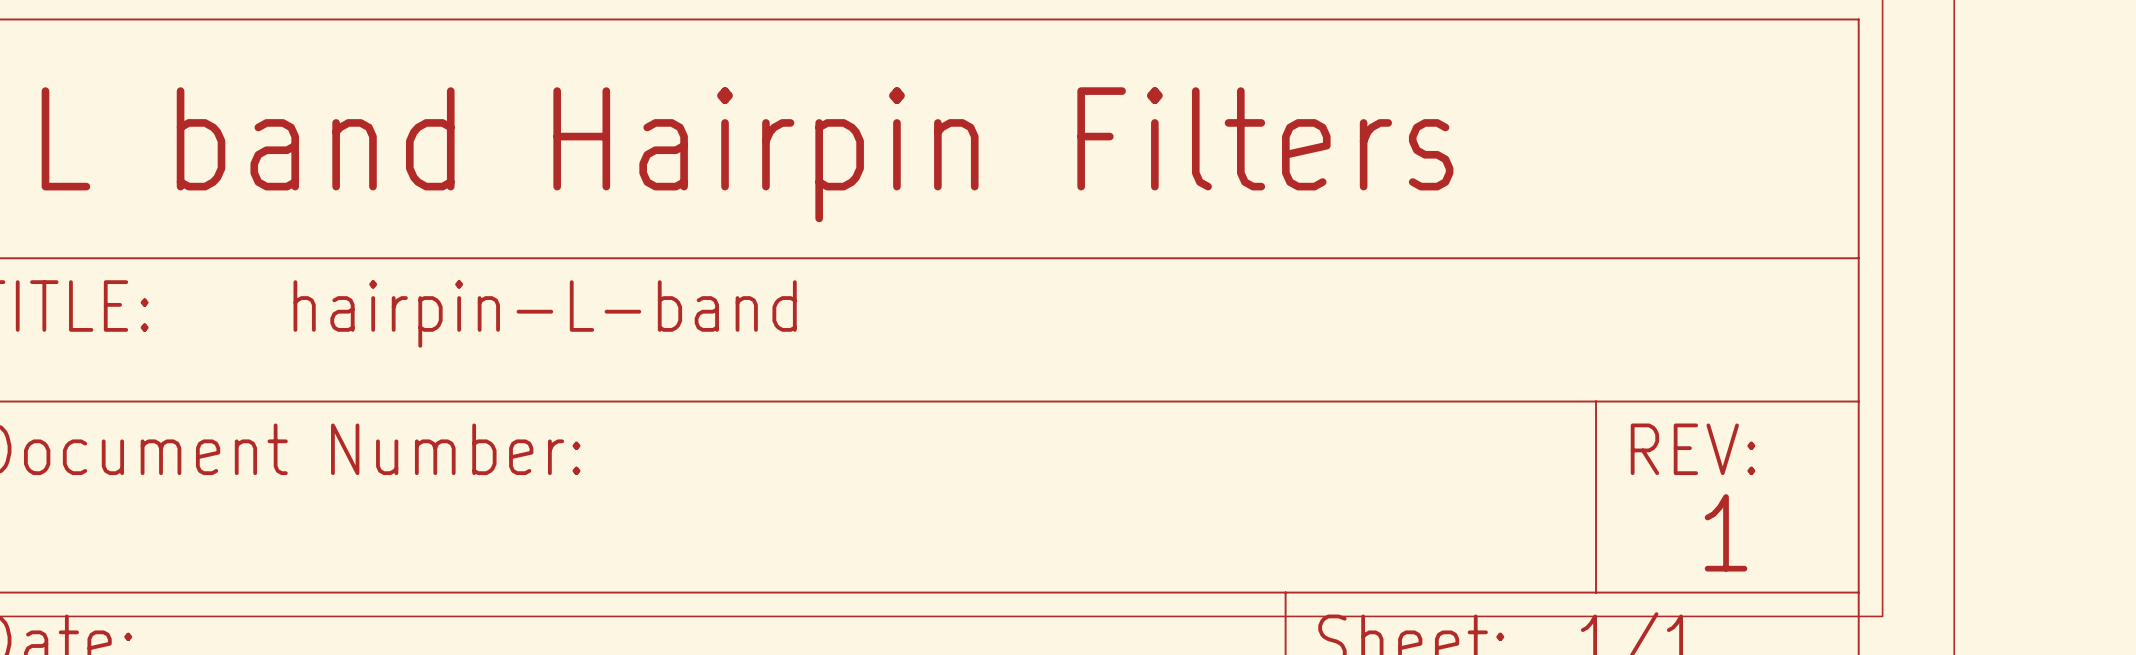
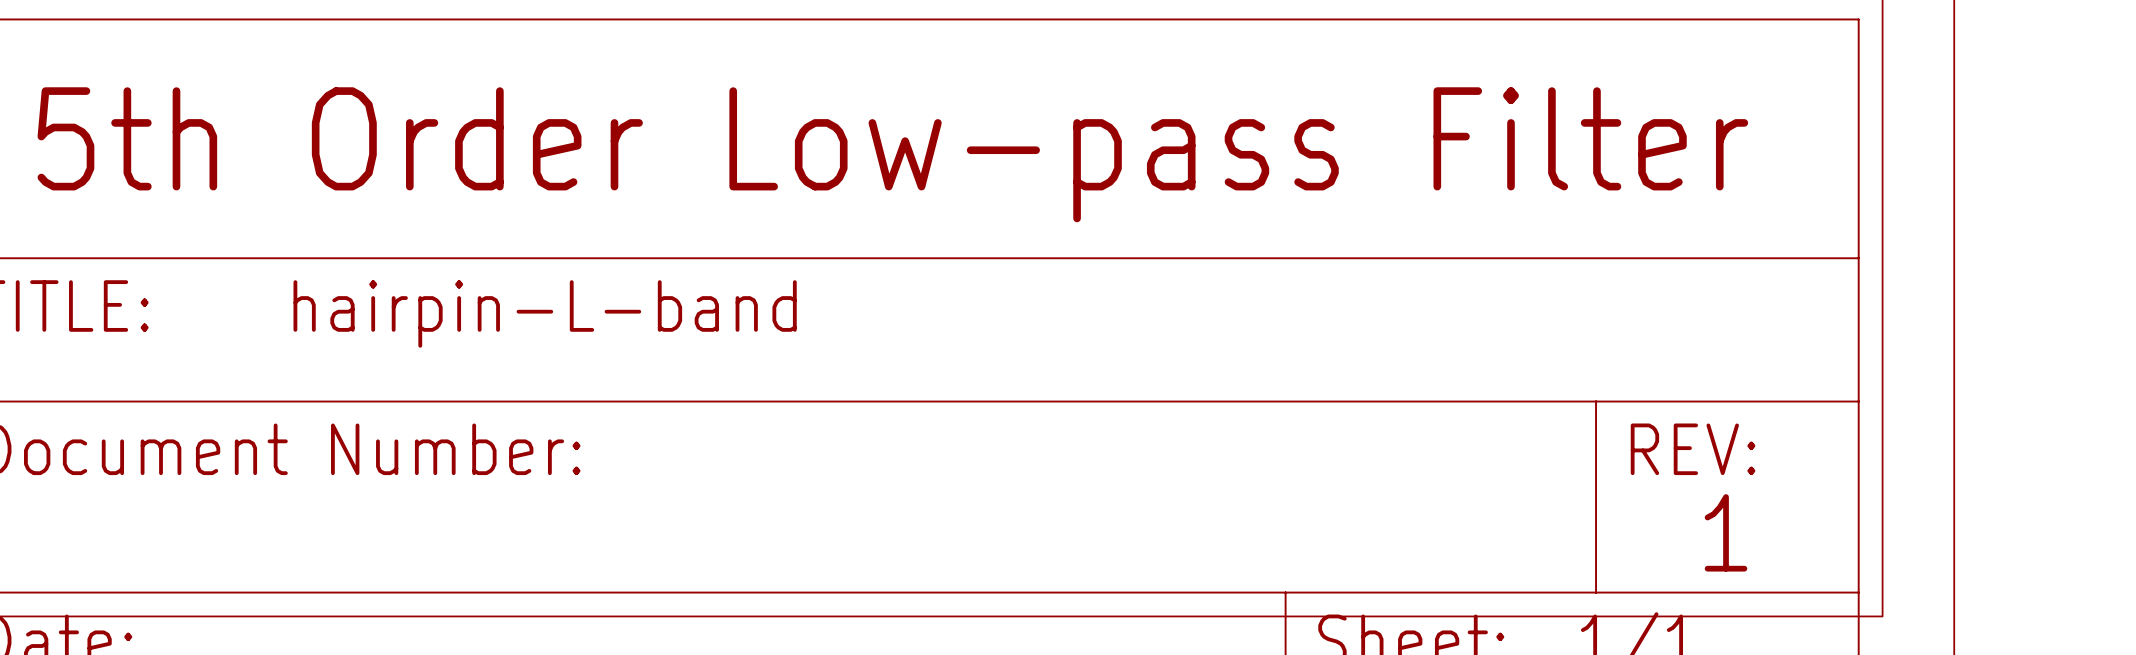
text: L band Hairpin Filters (747, 154) -> 5th Order Low-pass Filter (892, 154)

